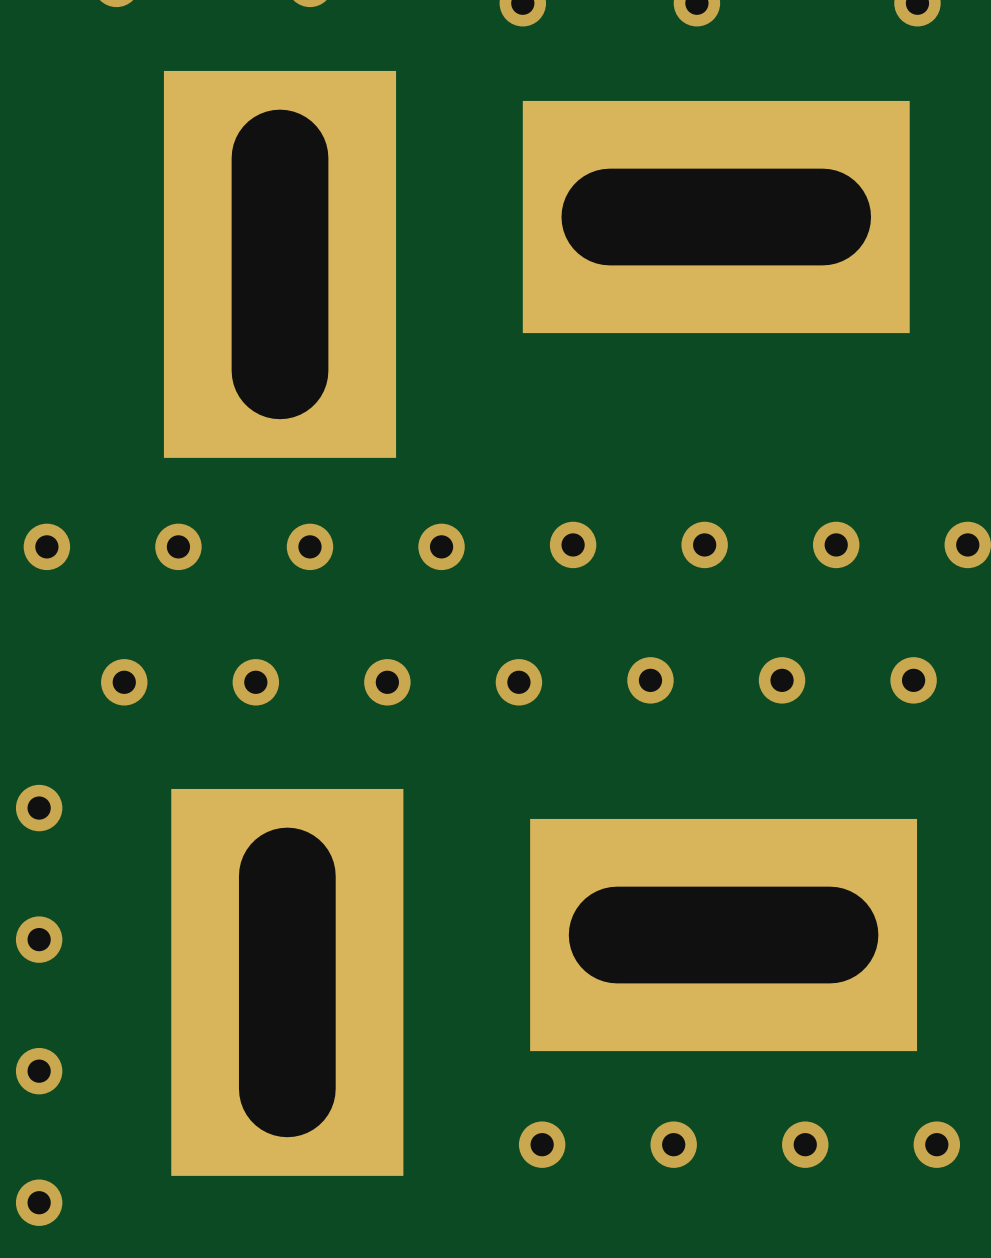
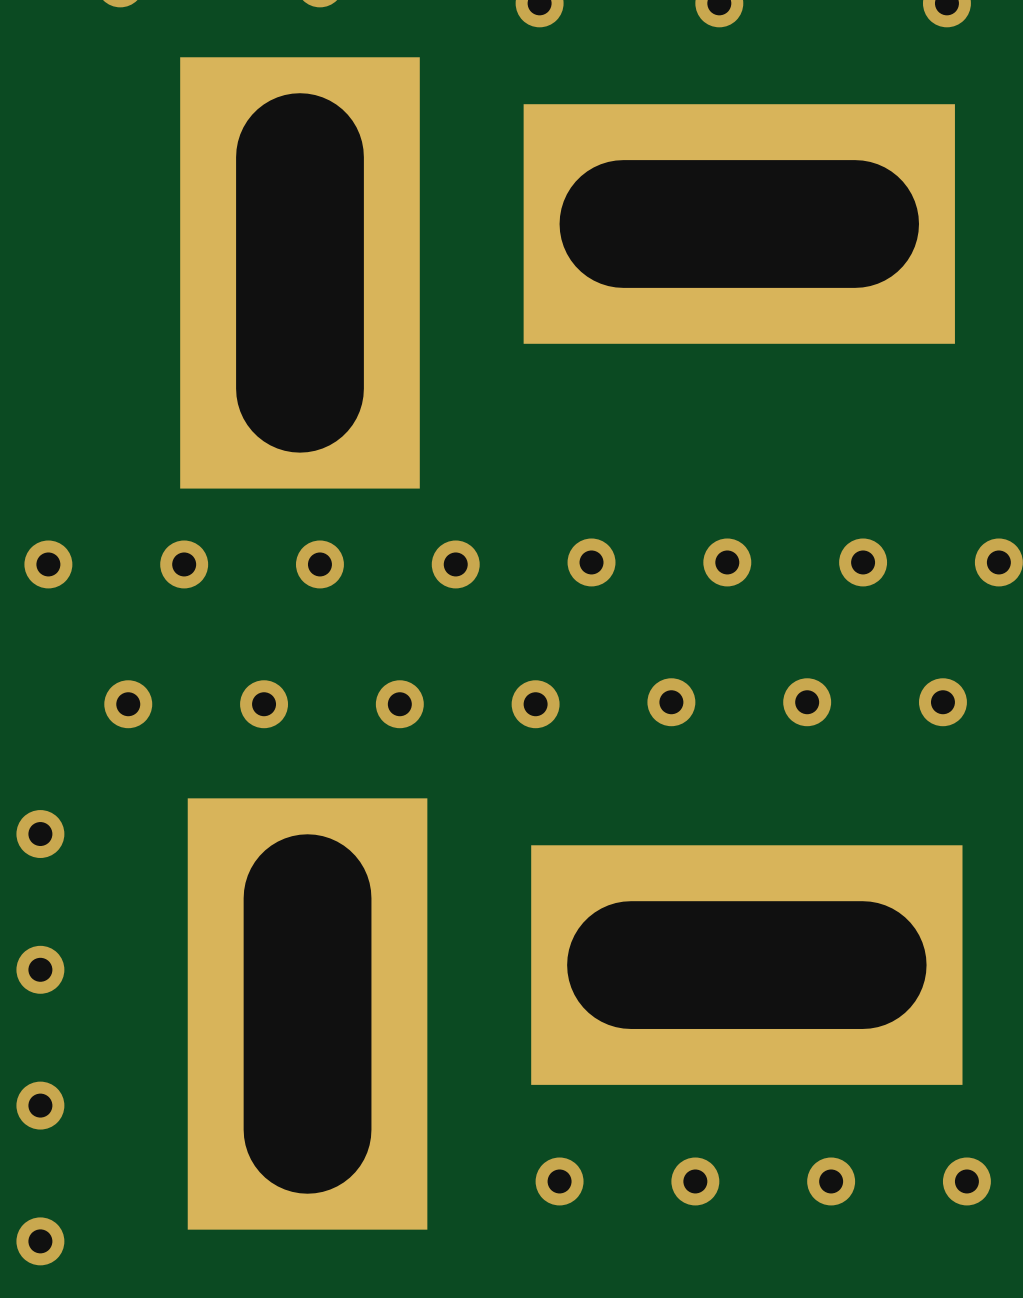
part footprint: [163, 70, 910, 458] -> [180, 57, 955, 489]
part footprint: [171, 788, 918, 1176] -> [187, 798, 963, 1230]

